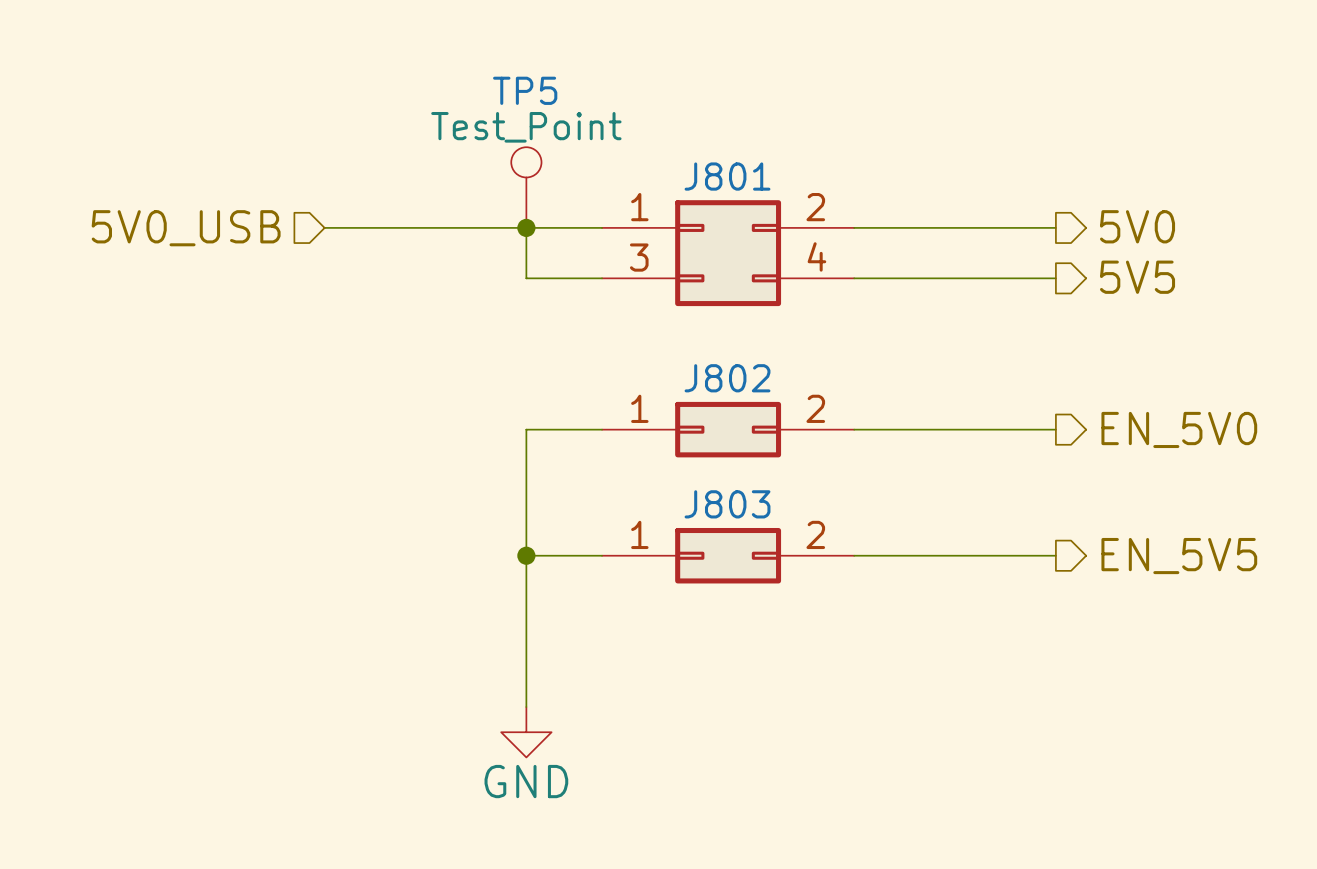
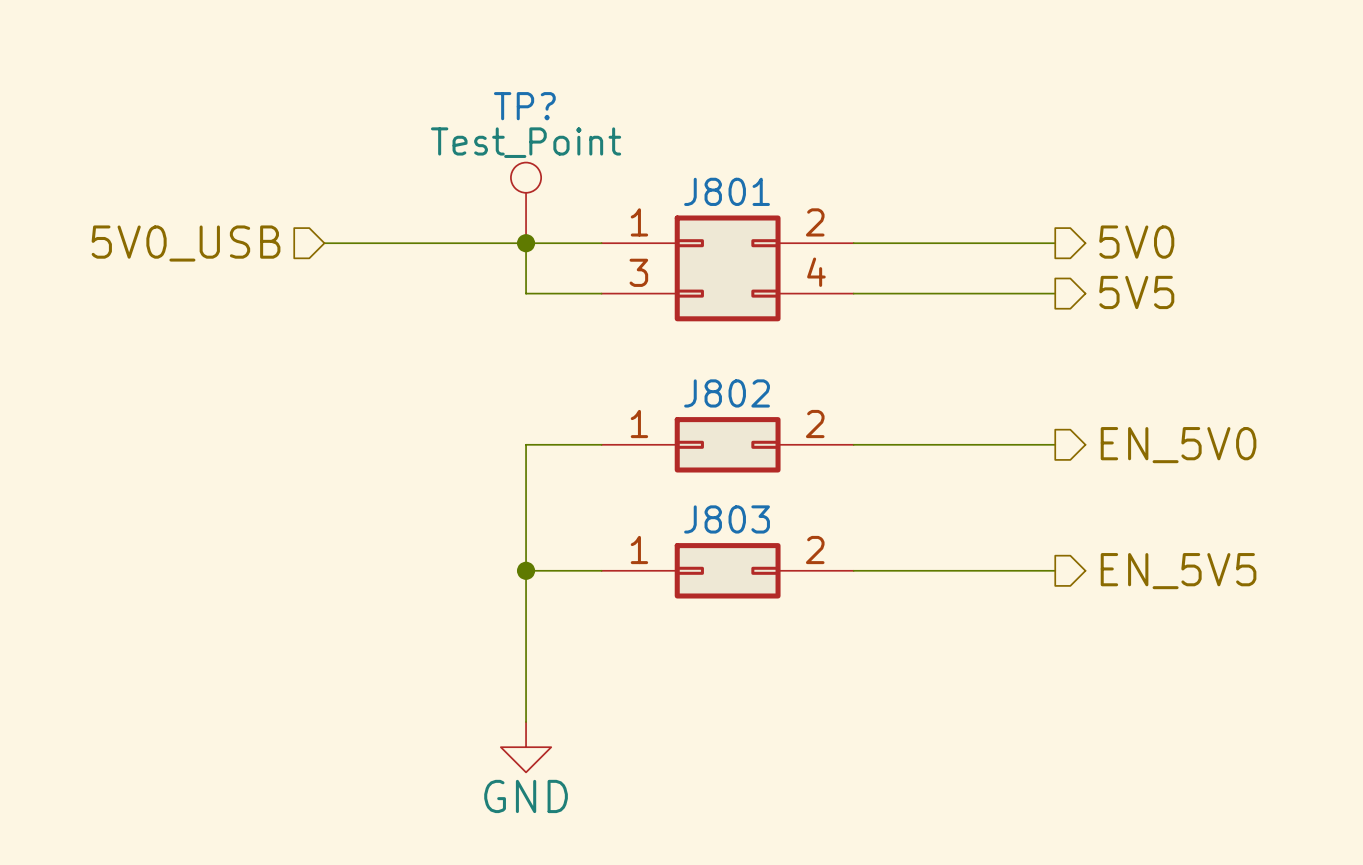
TP5 name: TP5 (525, 90) -> TP? (524, 106)

